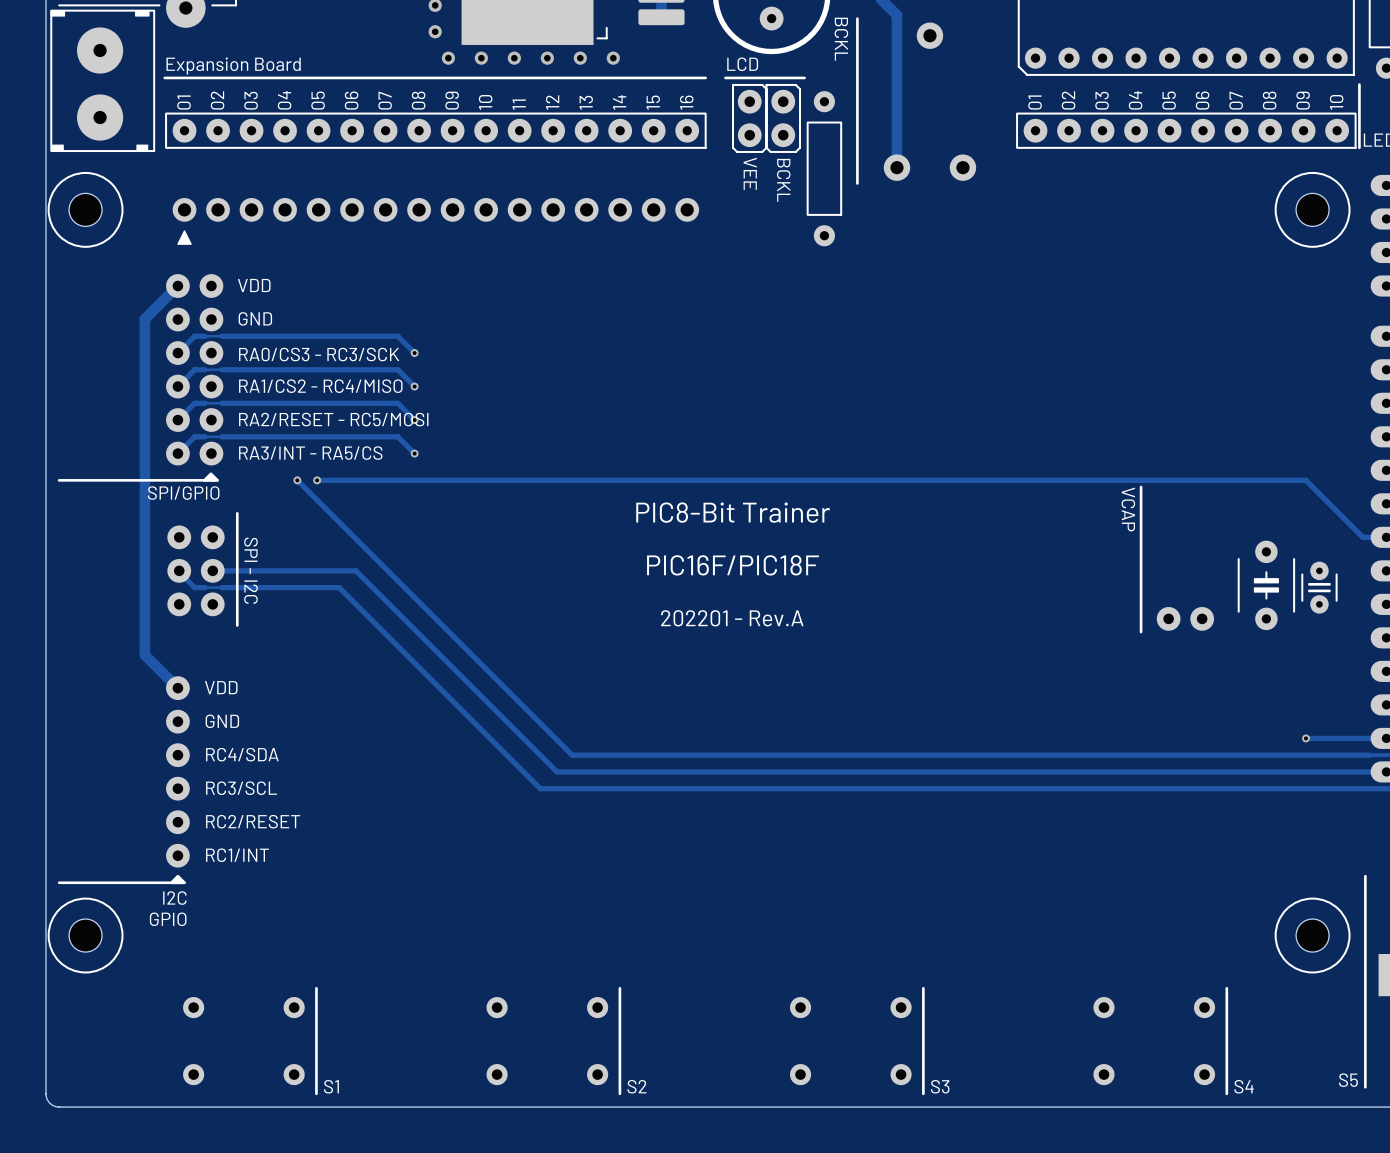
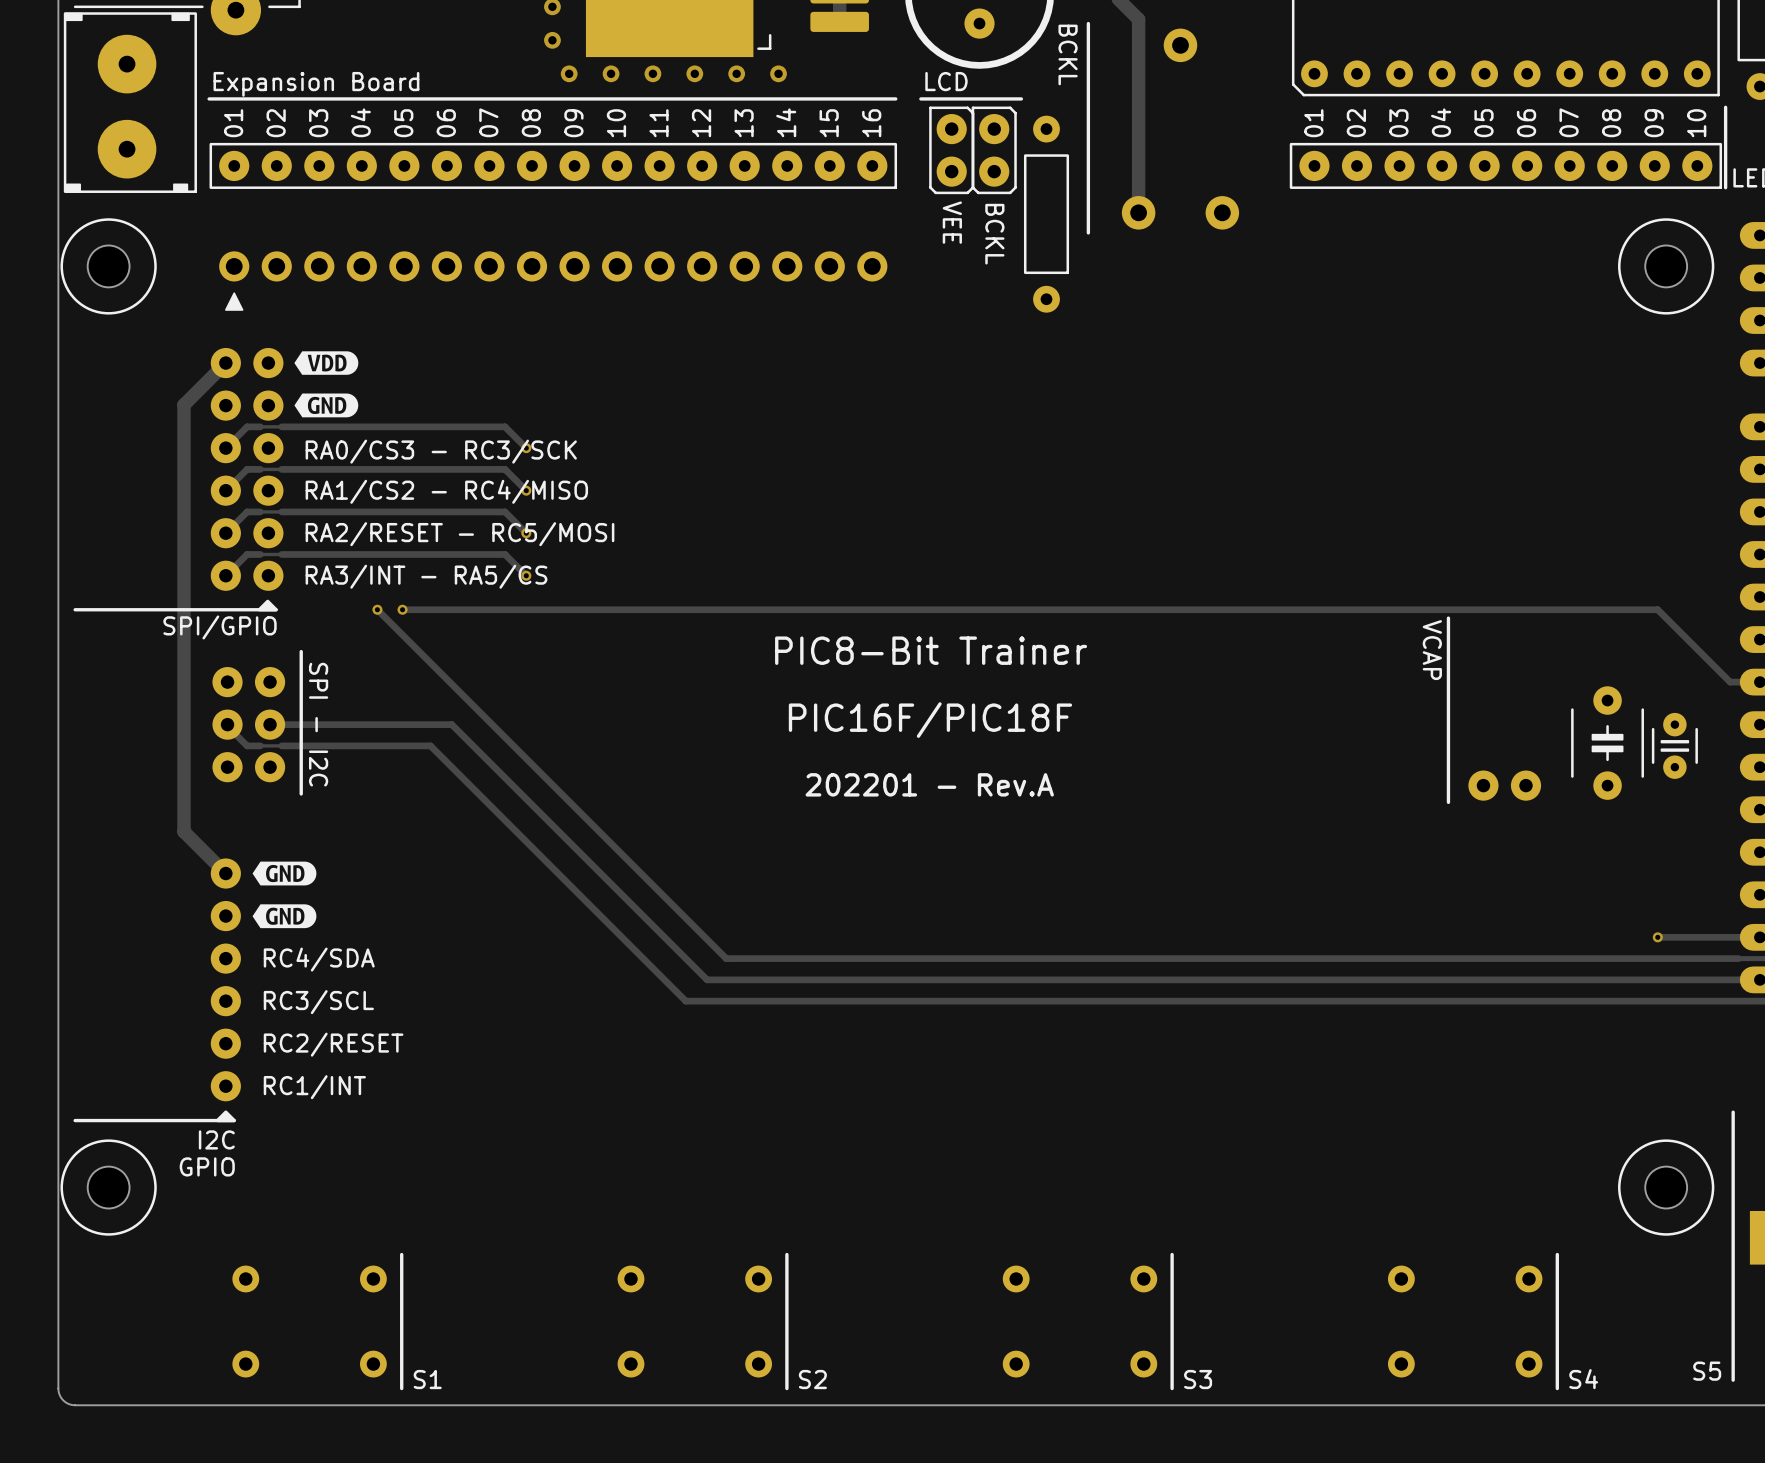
drawing: none -> [294, 351, 359, 418]
text: VDD (254, 285) -> none
text: GND (255, 318) -> none
drawing: none -> [252, 861, 317, 929]
text: VDD (221, 687) -> none
text: GND (222, 721) -> none

